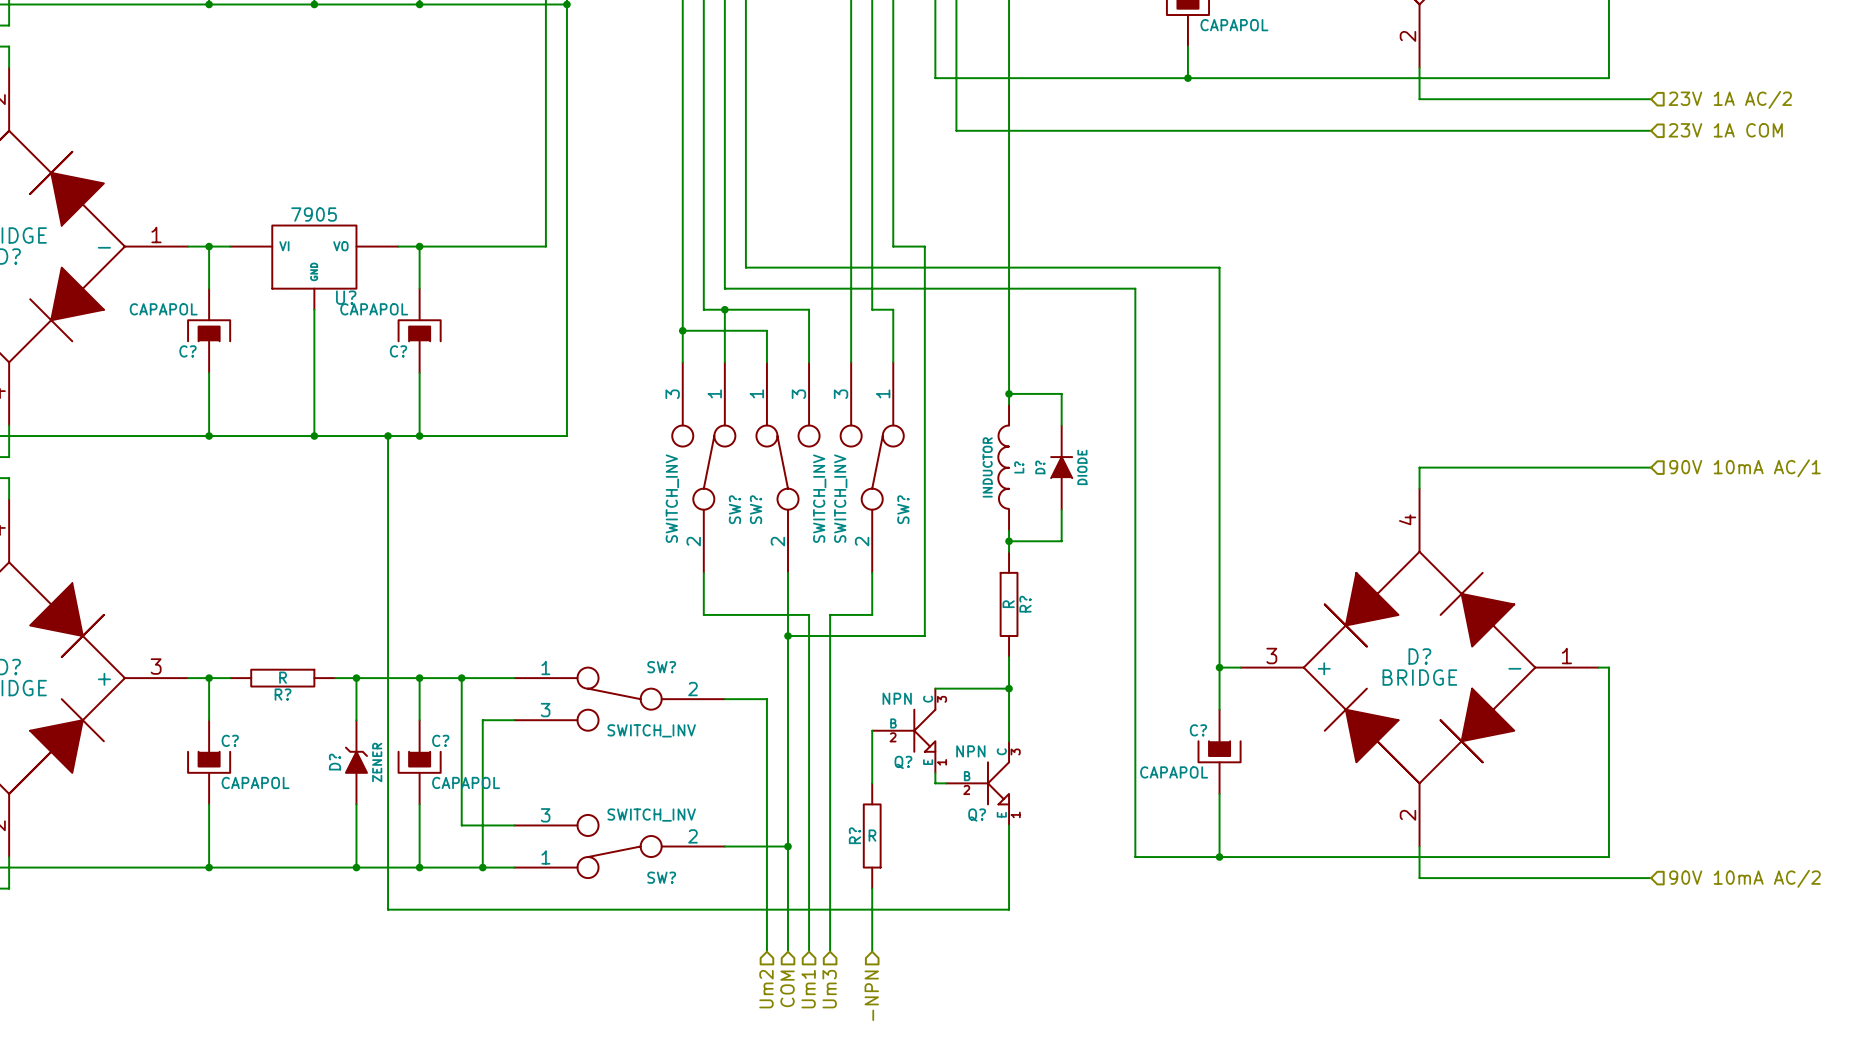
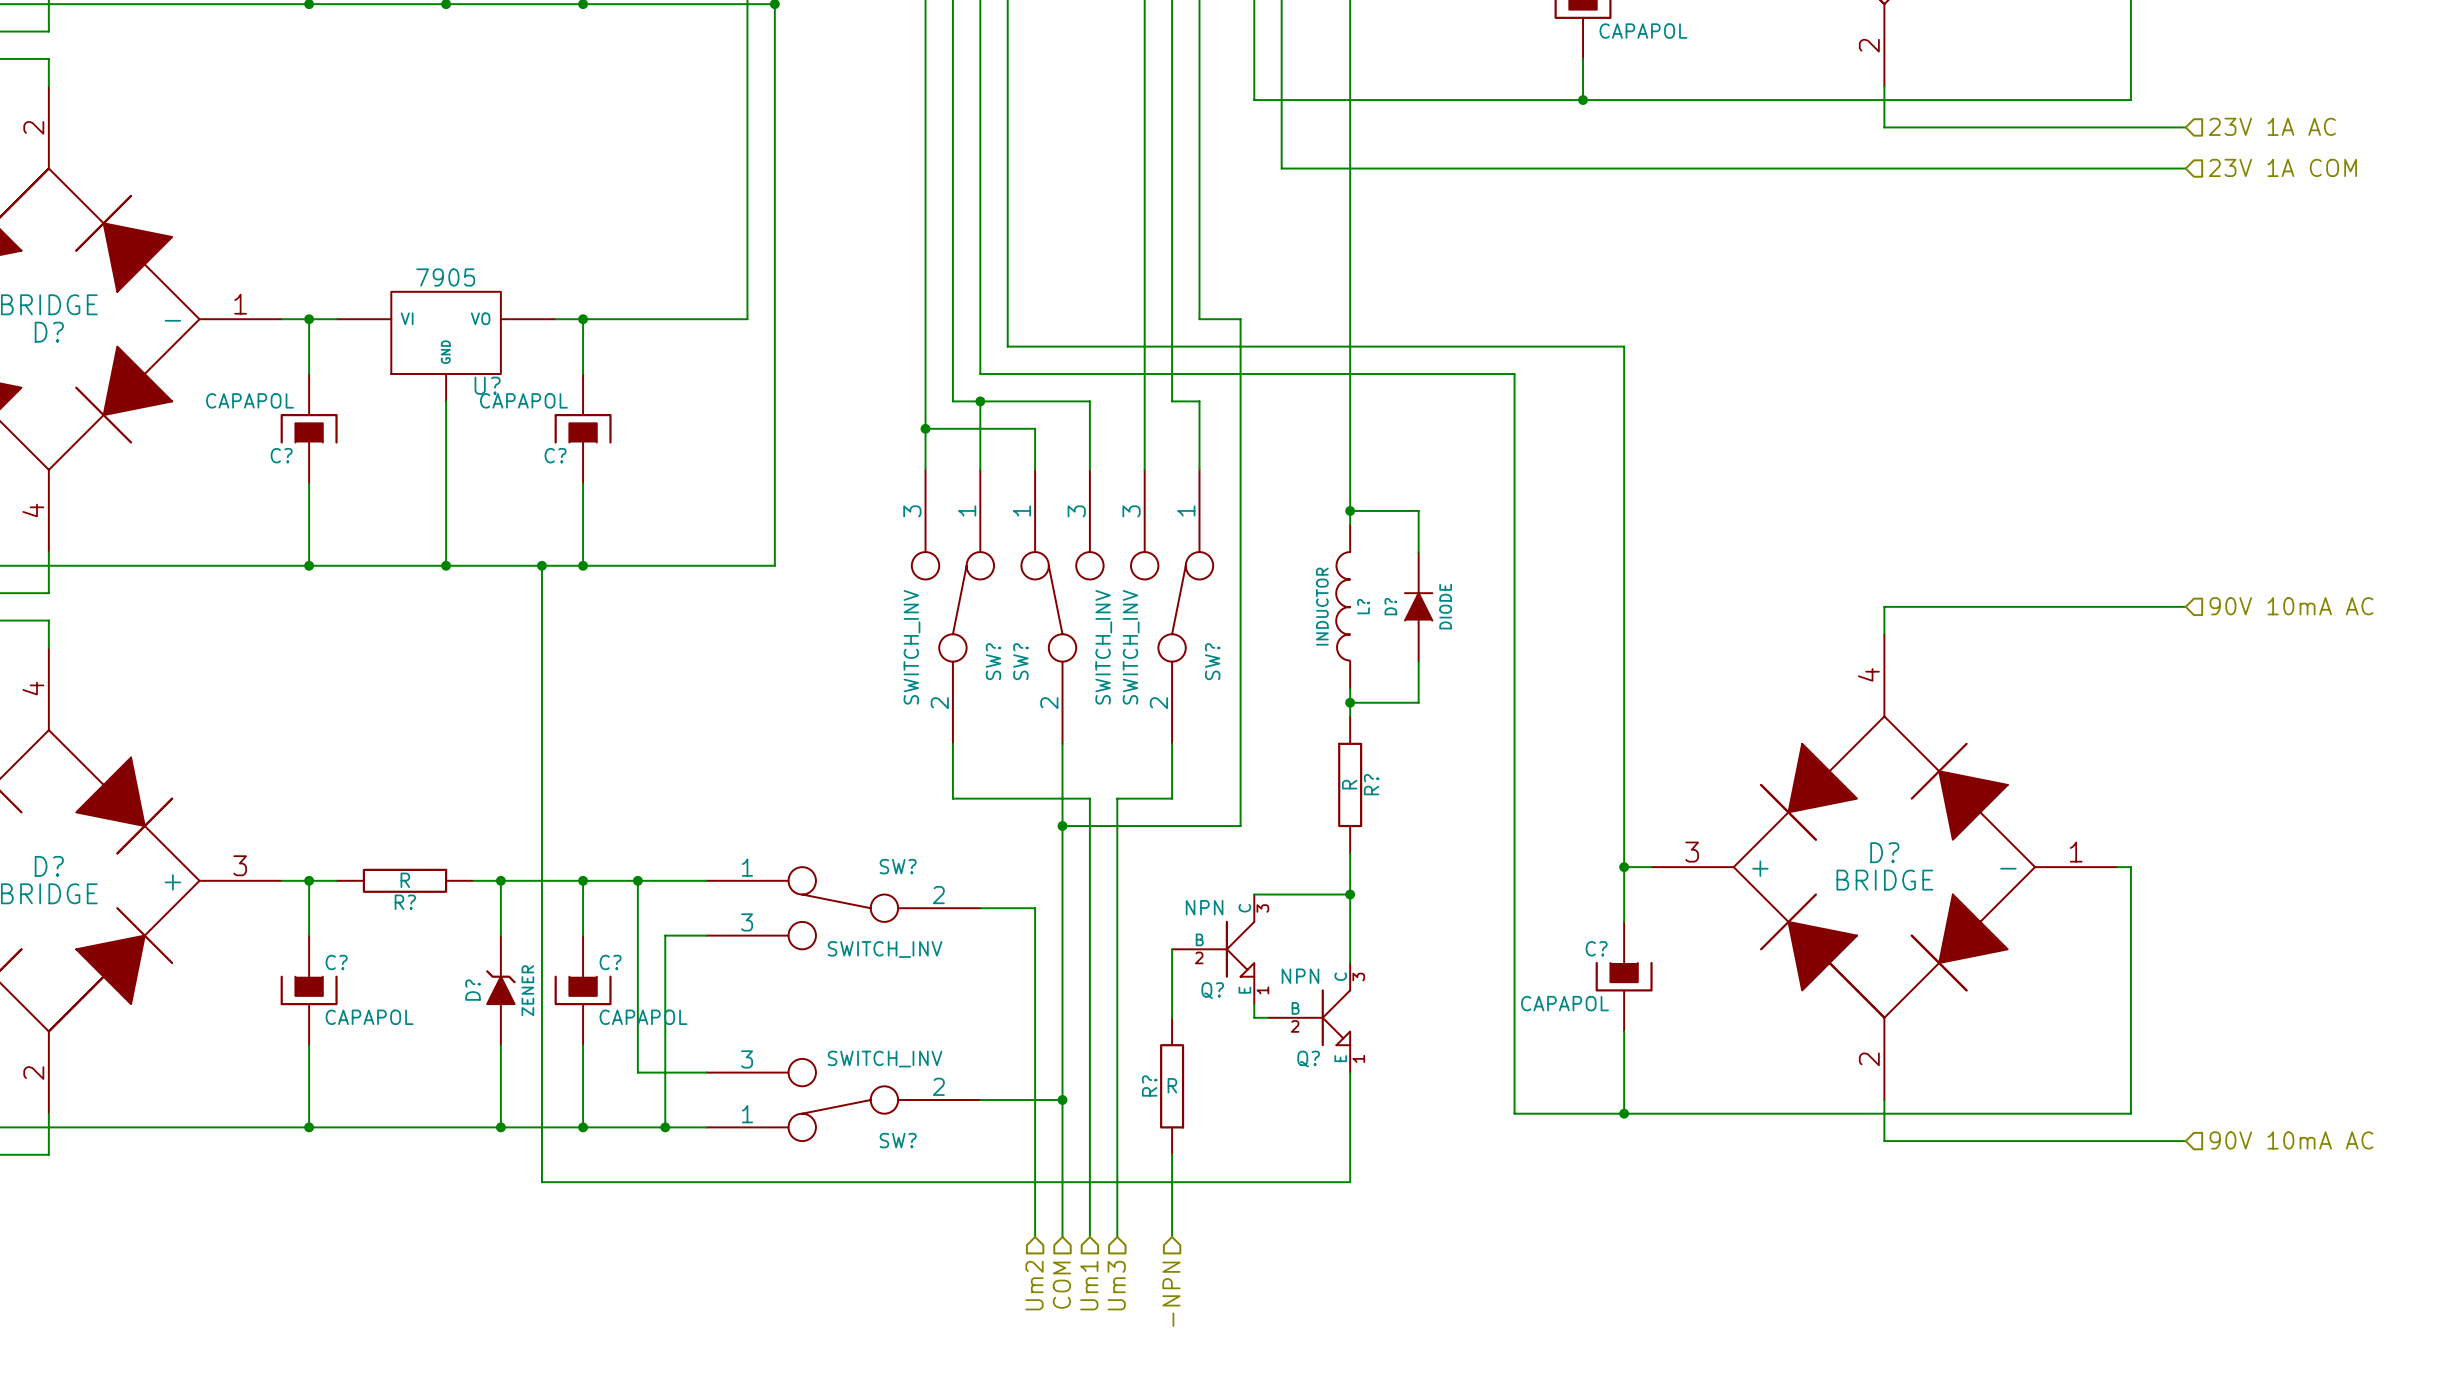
hierarchical label: 23V 1A AC/2 (1730, 99) -> 23V 1A AC (2272, 126)
hierarchical label: 90V 10mA AC/1 (1744, 468) -> 90V 10mA AC (2291, 606)
hierarchical label: 90V 10mA AC/2 (1744, 878) -> 90V 10mA AC (2291, 1140)

